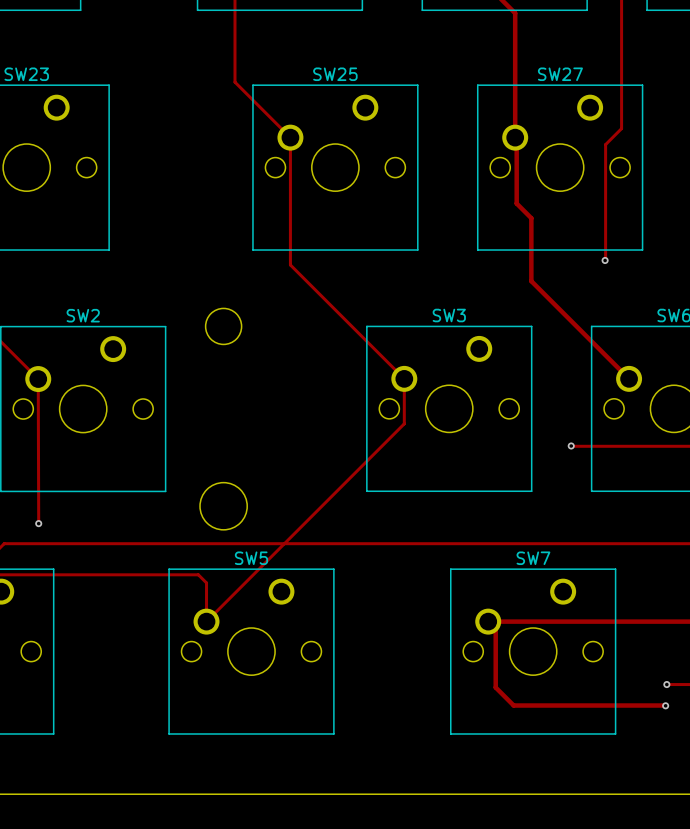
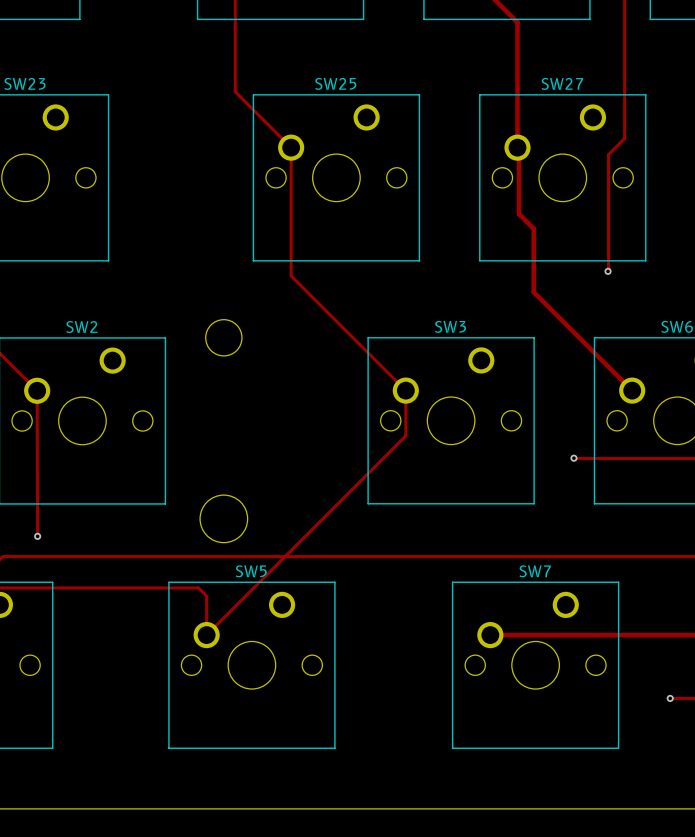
track: (495, 629) (495, 687) (513, 705) (665, 705) -> none
via: (665, 705) -> none

